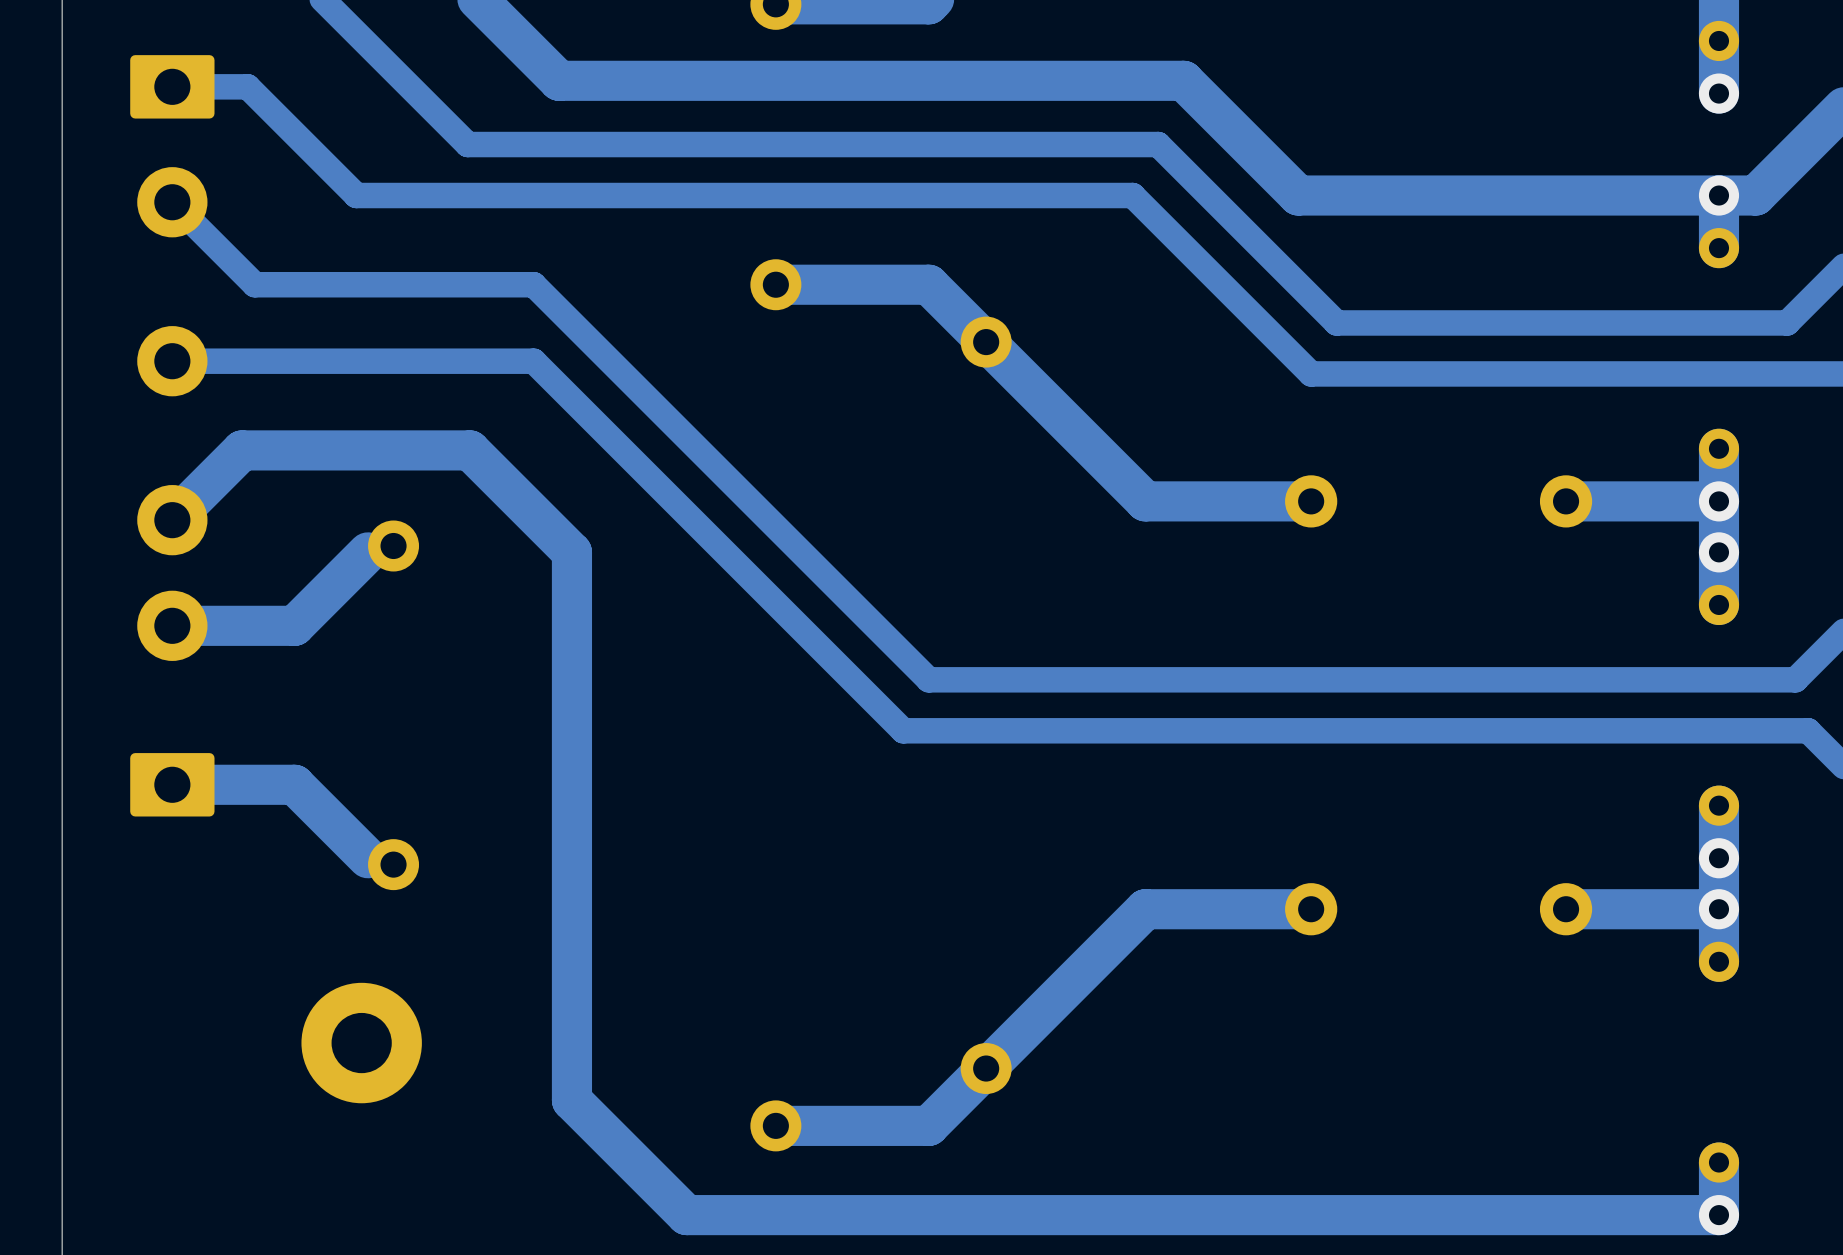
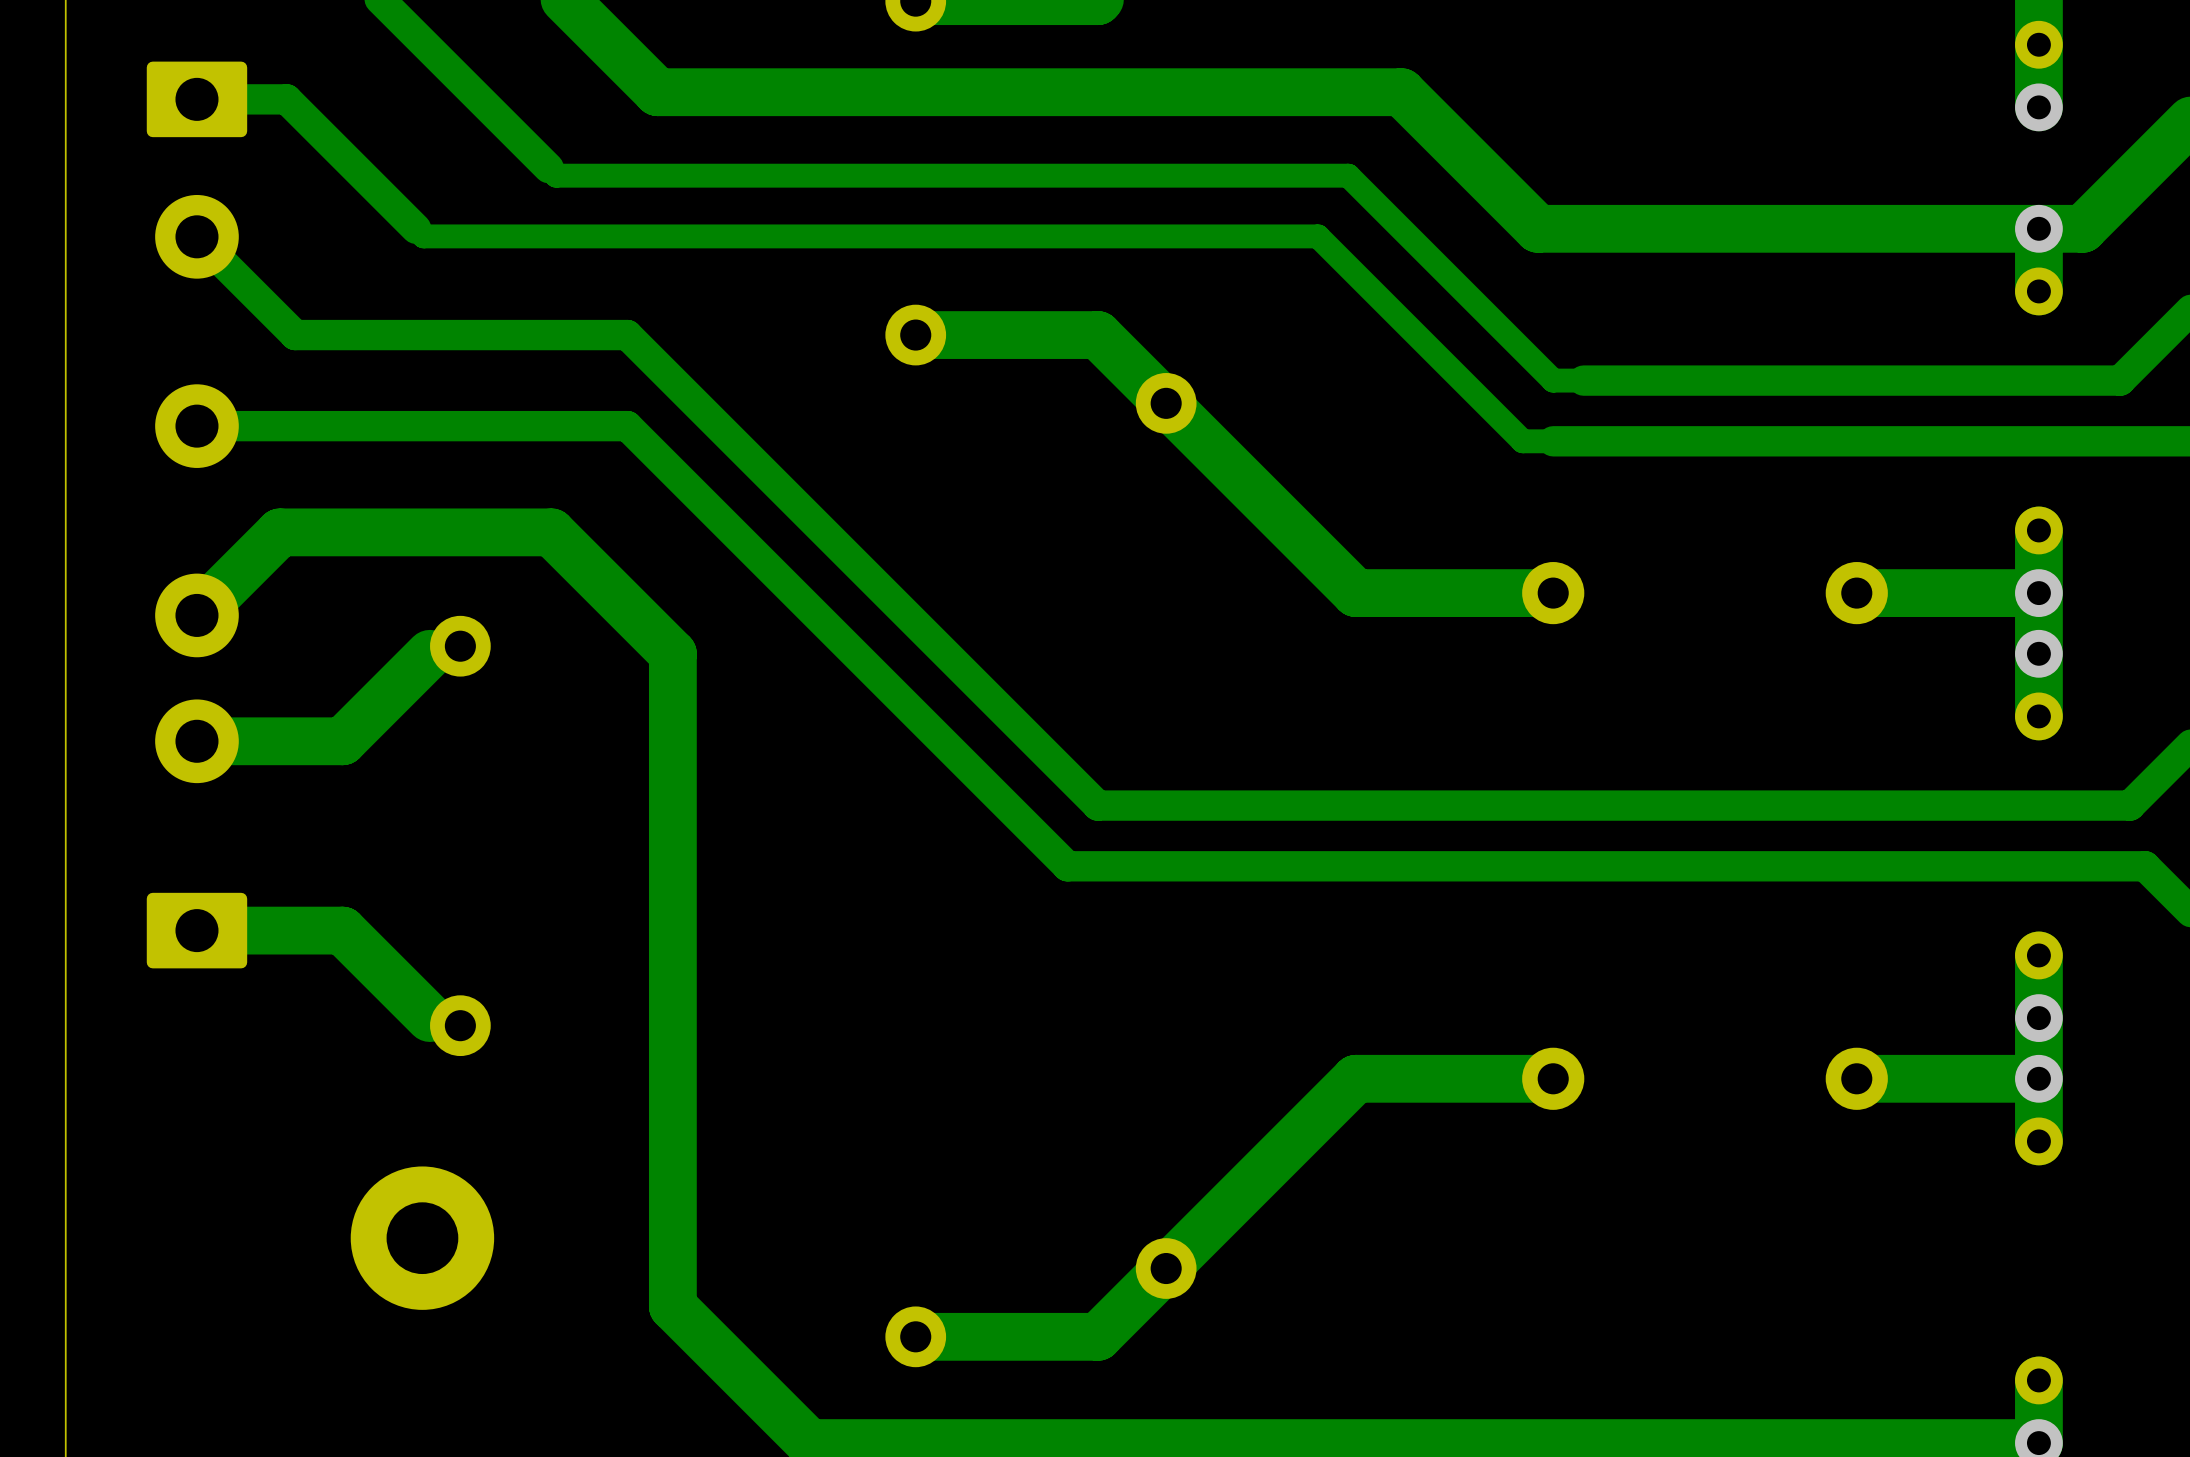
track: (467, 144) (1158, 144) (1336, 322) -> (548, 168) (556, 175) (1348, 175) (1553, 380) (1583, 380)
track: (356, 195) (1132, 195) (1311, 373) -> (416, 228) (423, 236) (1317, 236) (1522, 441) (1553, 441)

